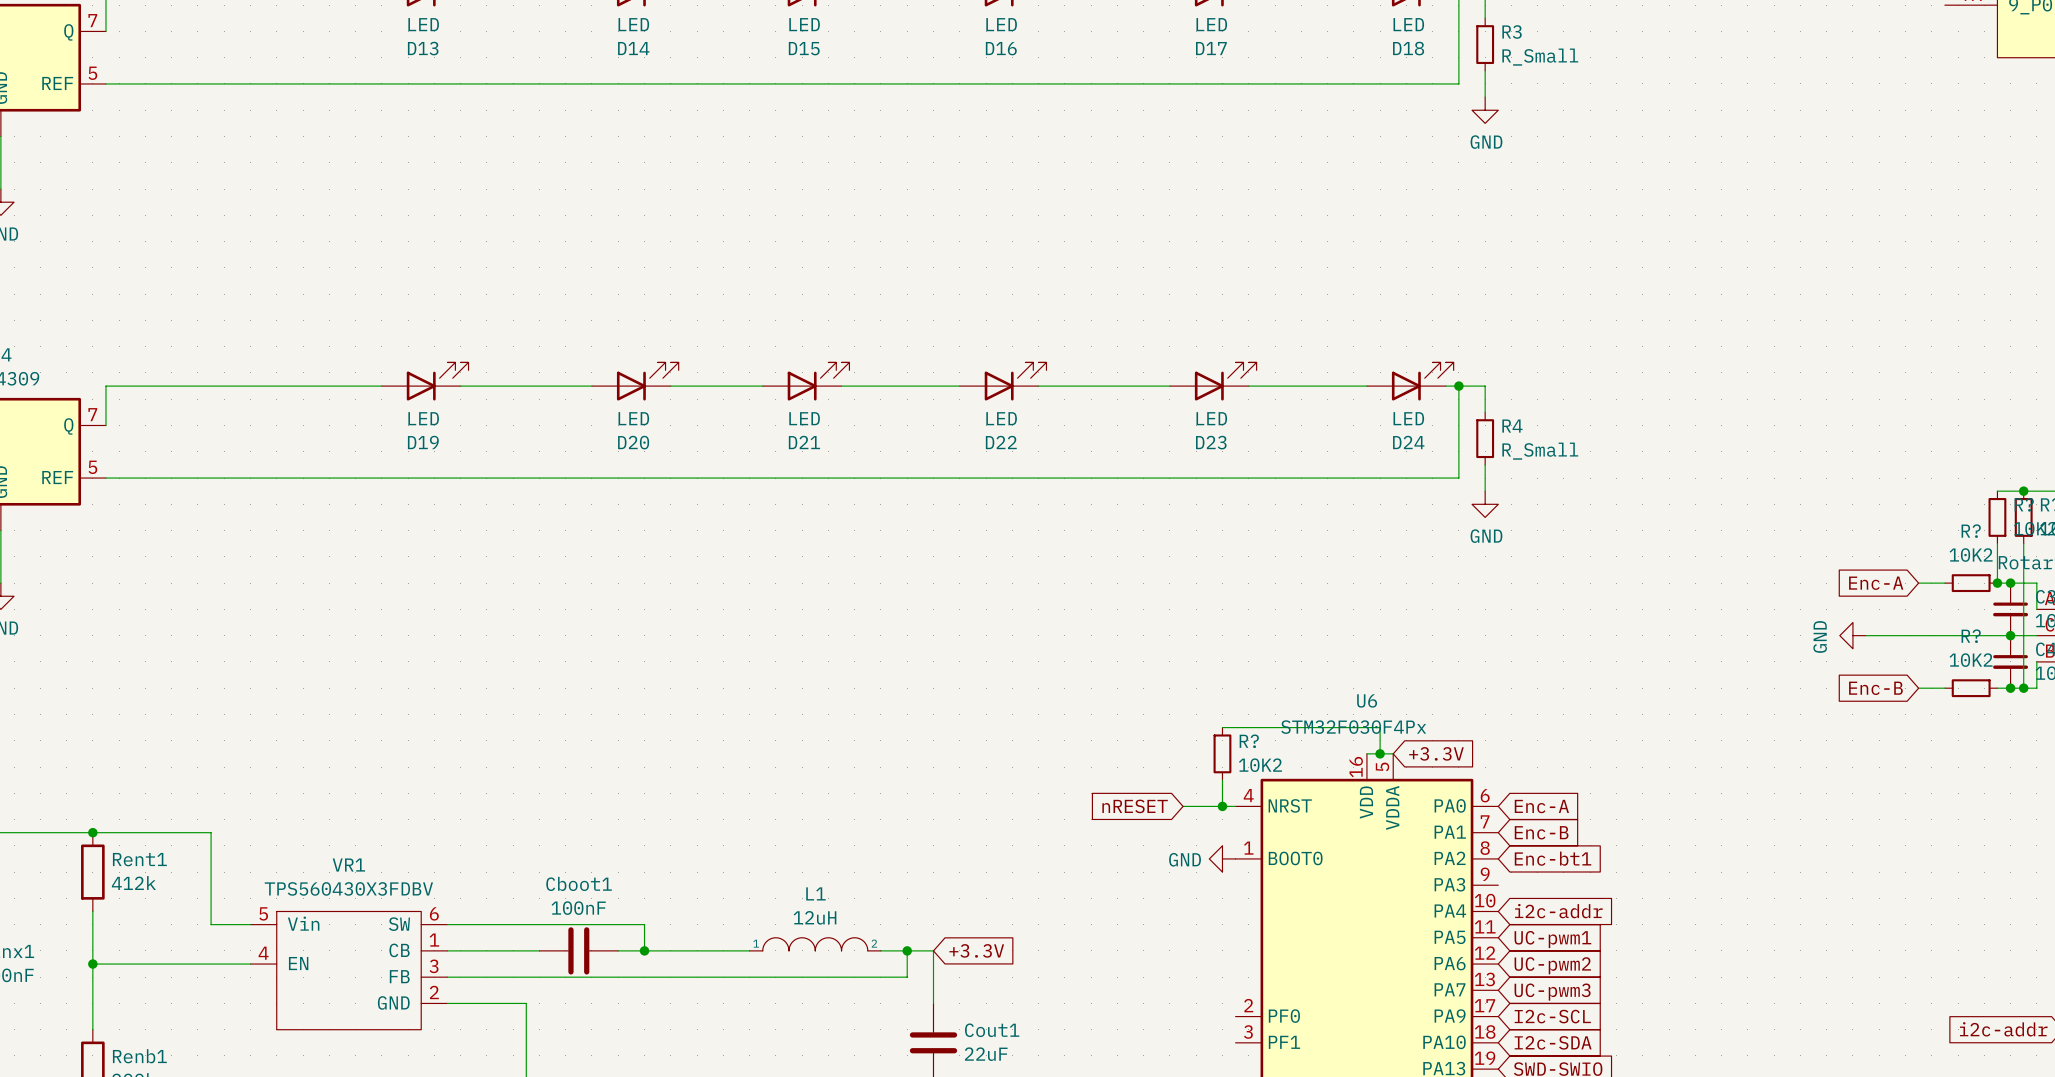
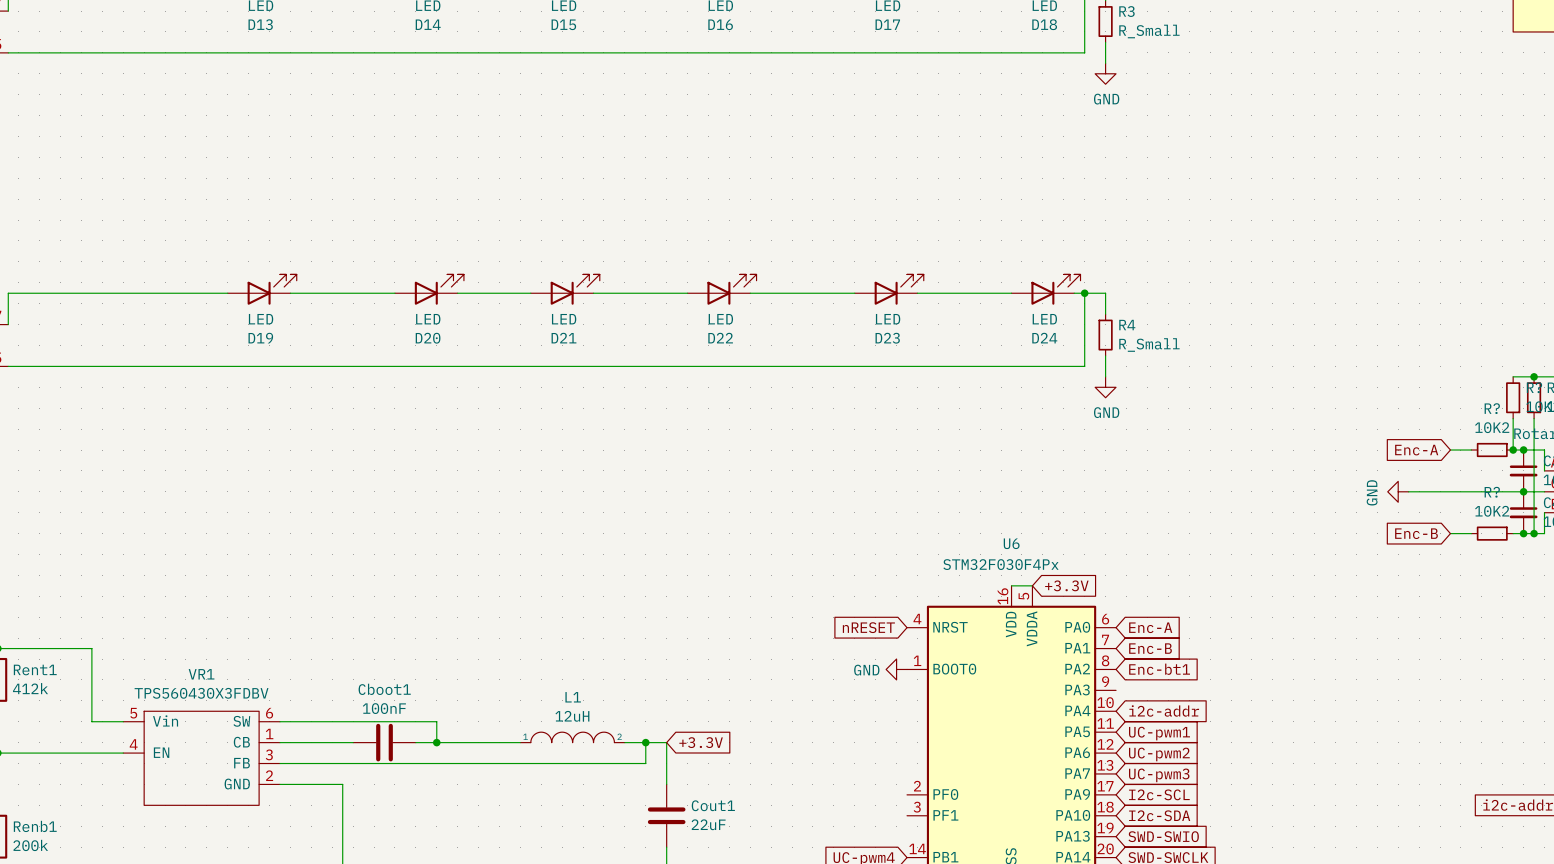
wire: (1222, 727) (1380, 727) (1380, 753) -> none
R?: 10K2 (1222, 753) -> none
junction: (1380, 753) -> none
wire: (1222, 780) (1222, 806) -> none
global label position: nRESET (1135, 806) -> nRESET (868, 627)
wire: (1183, 806) (1235, 806) -> none
junction: (1222, 806) -> none

